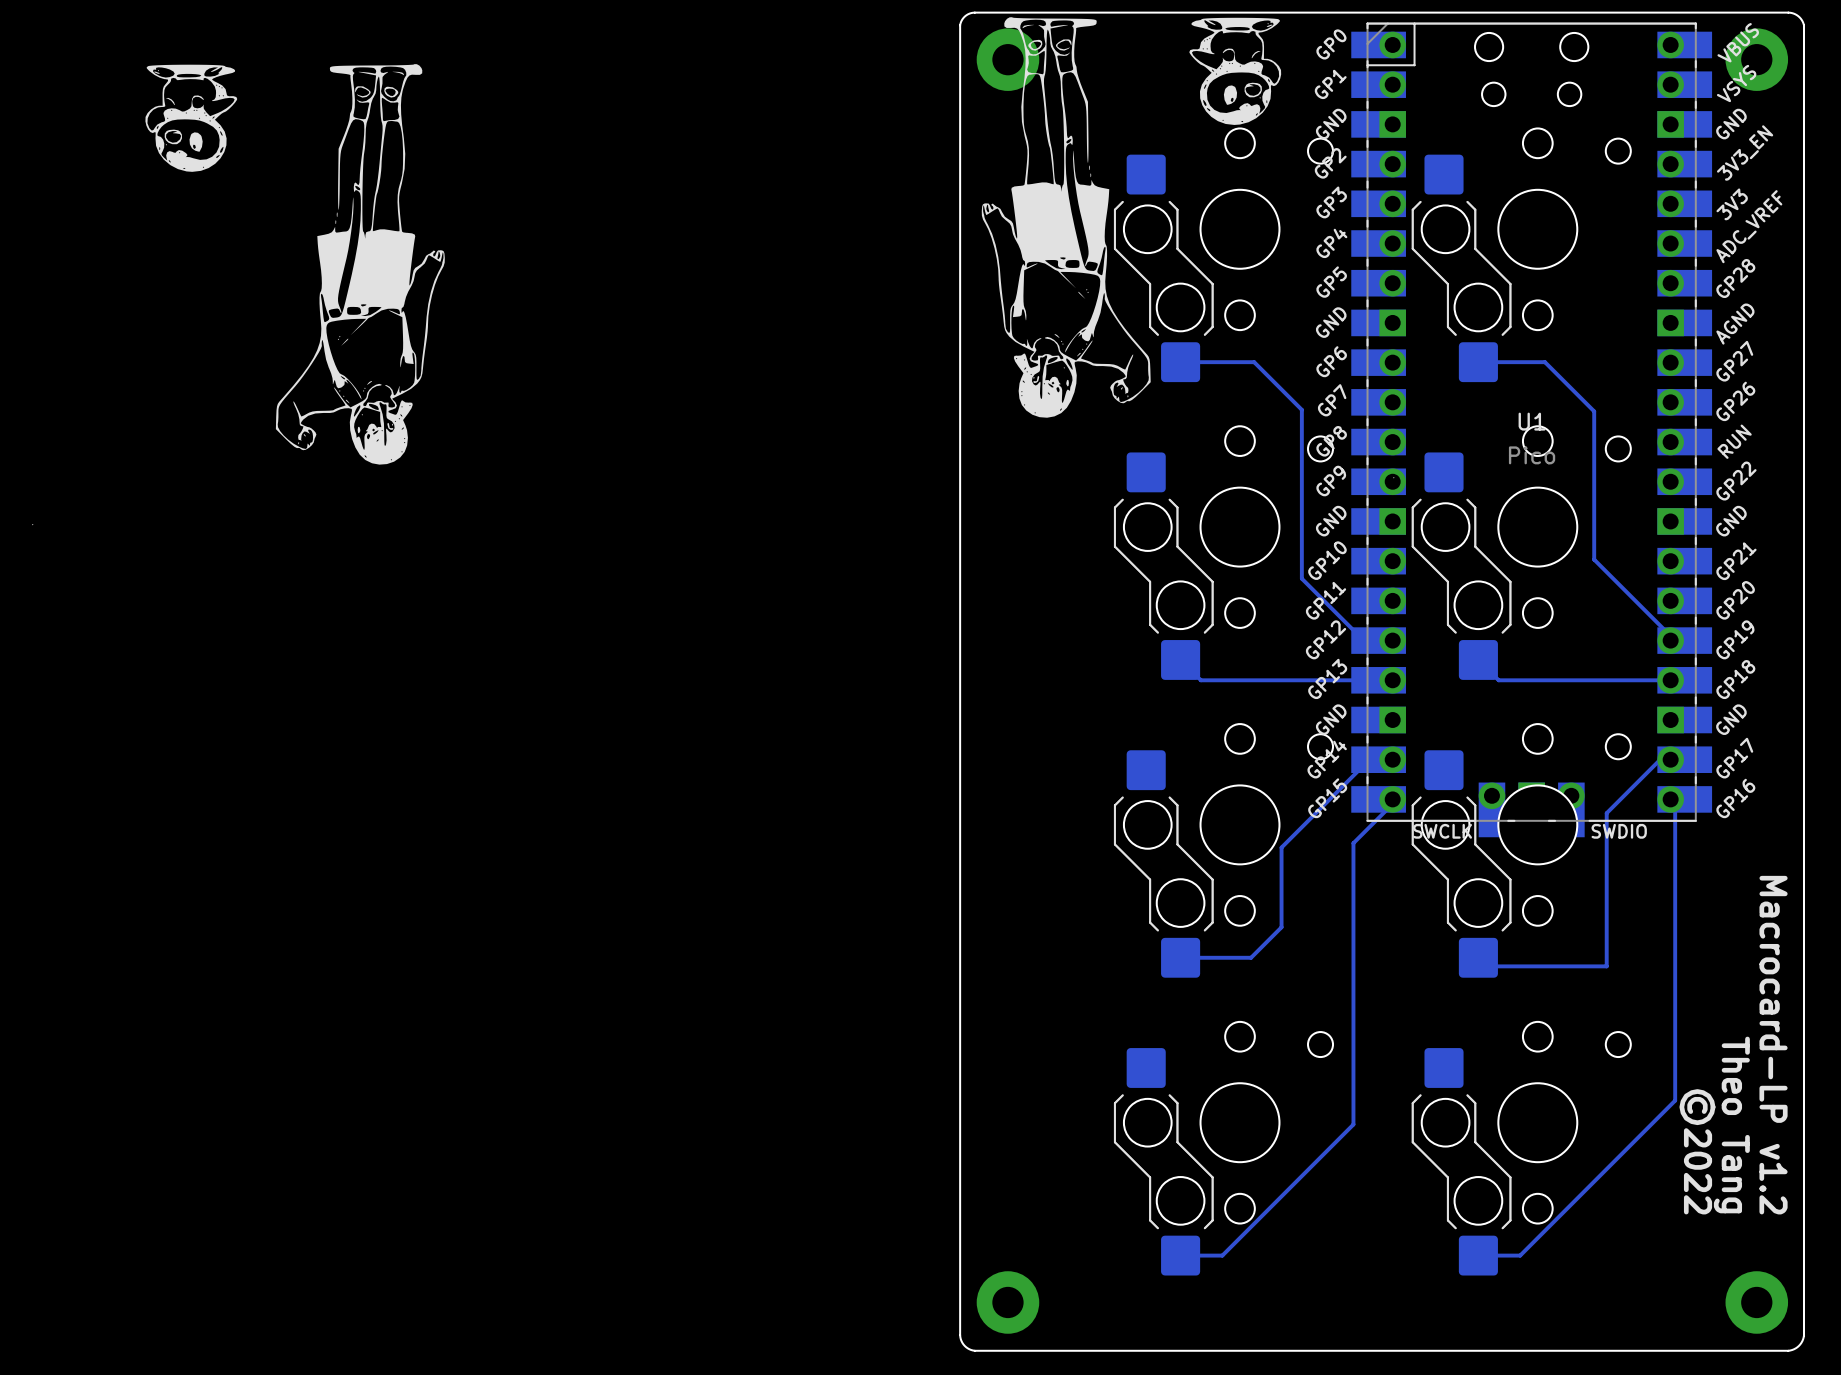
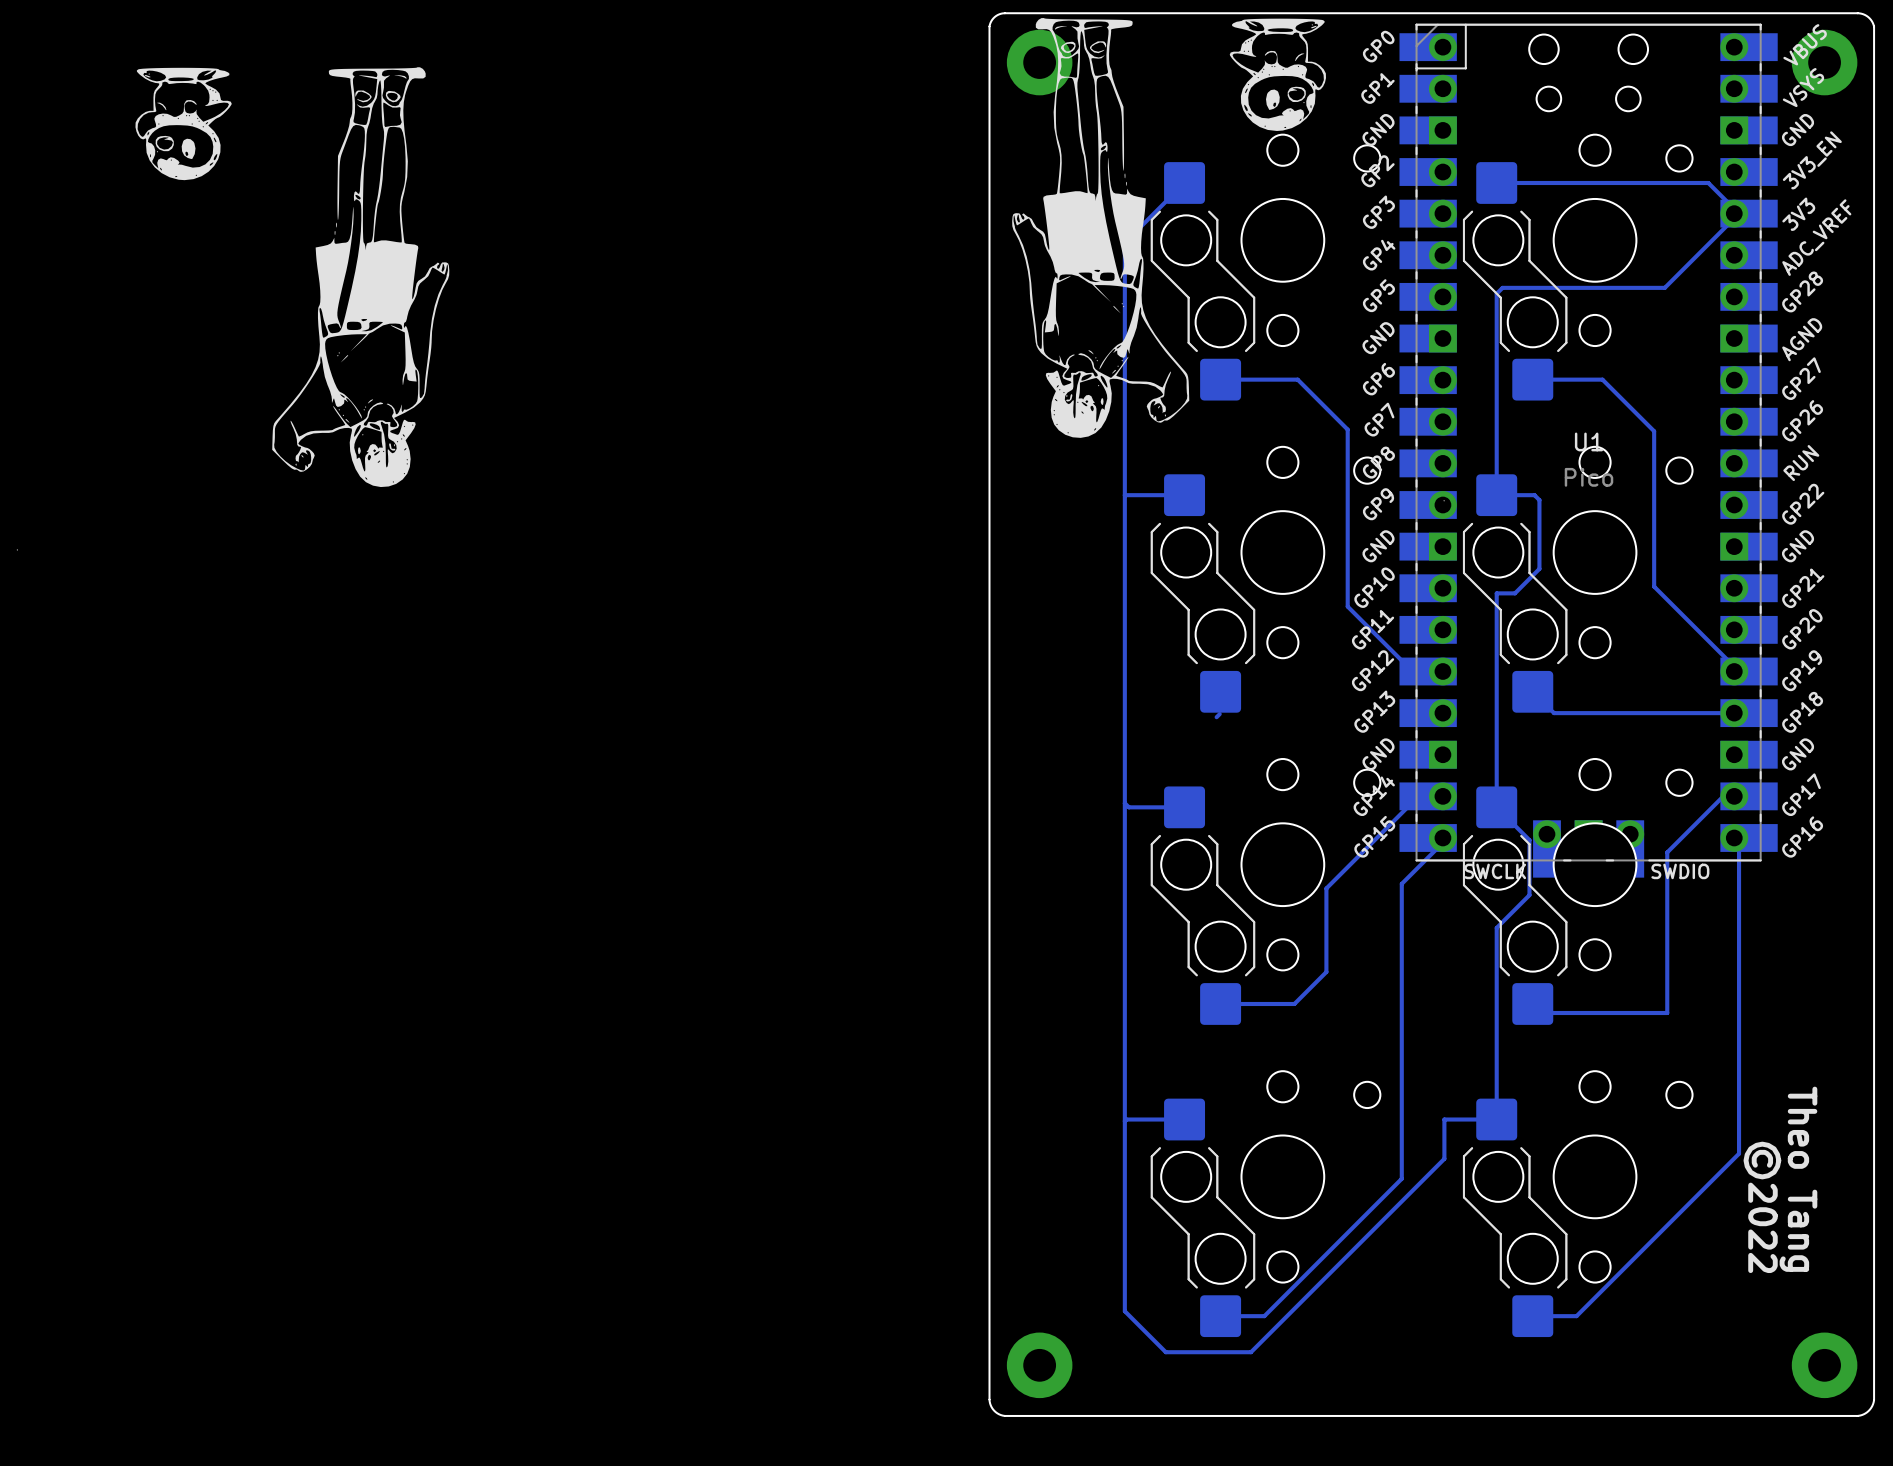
bottom track: none -> (1496, 182) (1708, 182) (1739, 213) (1664, 287) (1502, 287) (1496, 293) (1496, 495) (1534, 495) (1539, 500) (1539, 568) (1514, 593) (1496, 593) (1496, 807) (1529, 840) (1529, 895) (1496, 927) (1496, 1119) (1444, 1119) (1444, 1158) (1251, 1352) (1165, 1352) (1124, 1311) (1124, 242) (1184, 182)
bottom track: none -> (1184, 495) (1124, 495)
bottom track: (1180, 659) (1200, 680) (1397, 680) -> none
bottom track: none -> (1219, 714) (1216, 717)
bottom track: none -> (1124, 803) (1128, 807) (1184, 807)
text: Macrocard-LP v1.2 (1773, 1045) -> none
bottom track: none -> (1184, 1119) (1126, 1119) (1124, 1121)

